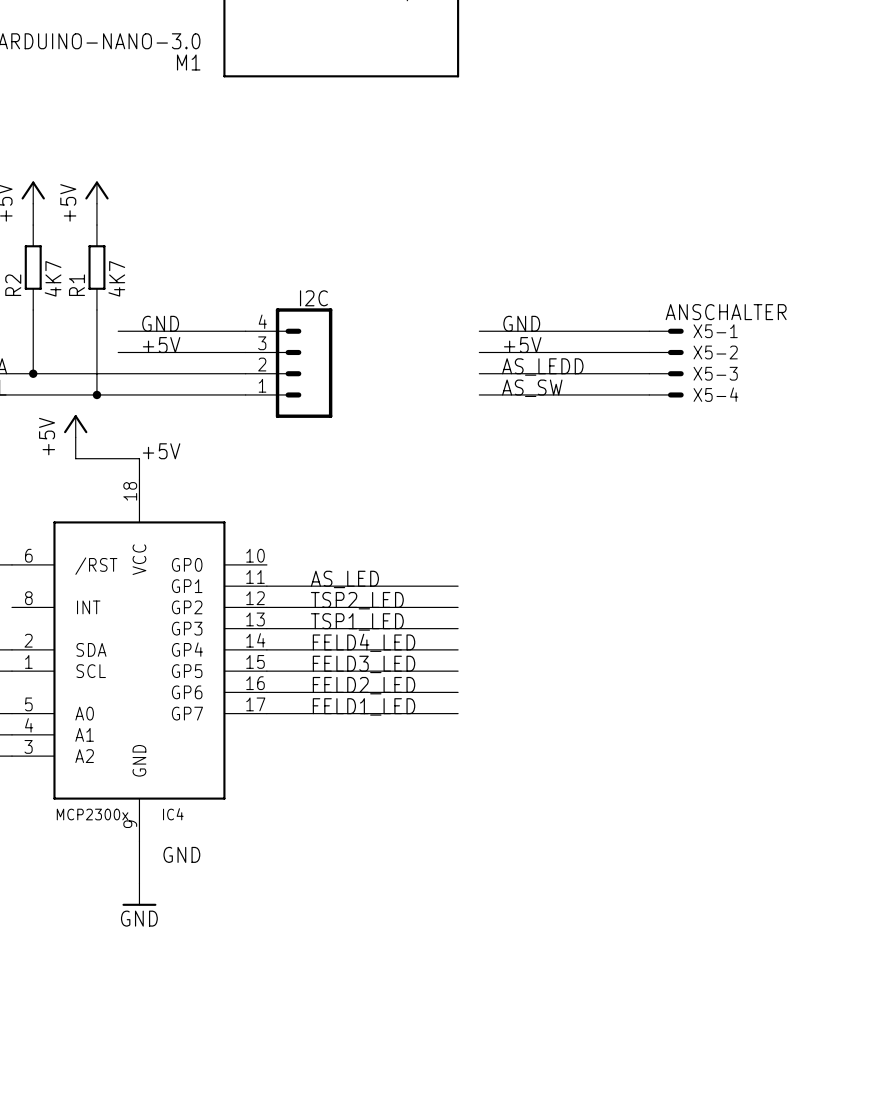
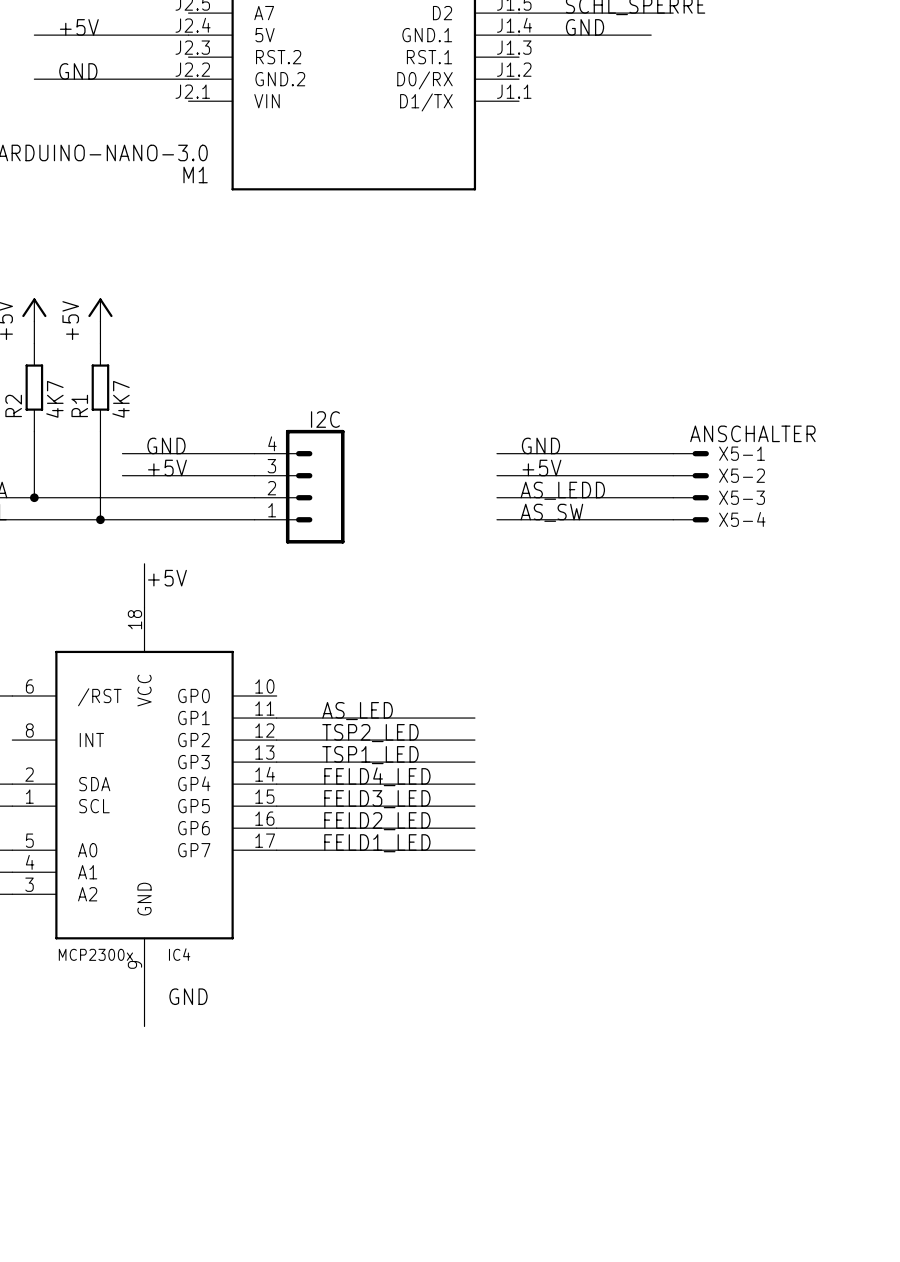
power symbol: +5V (75, 426) -> none
wire: (75, 437) (75, 458) (139, 458) -> (144, 563) (144, 585)
power symbol: GND (139, 894) -> none

